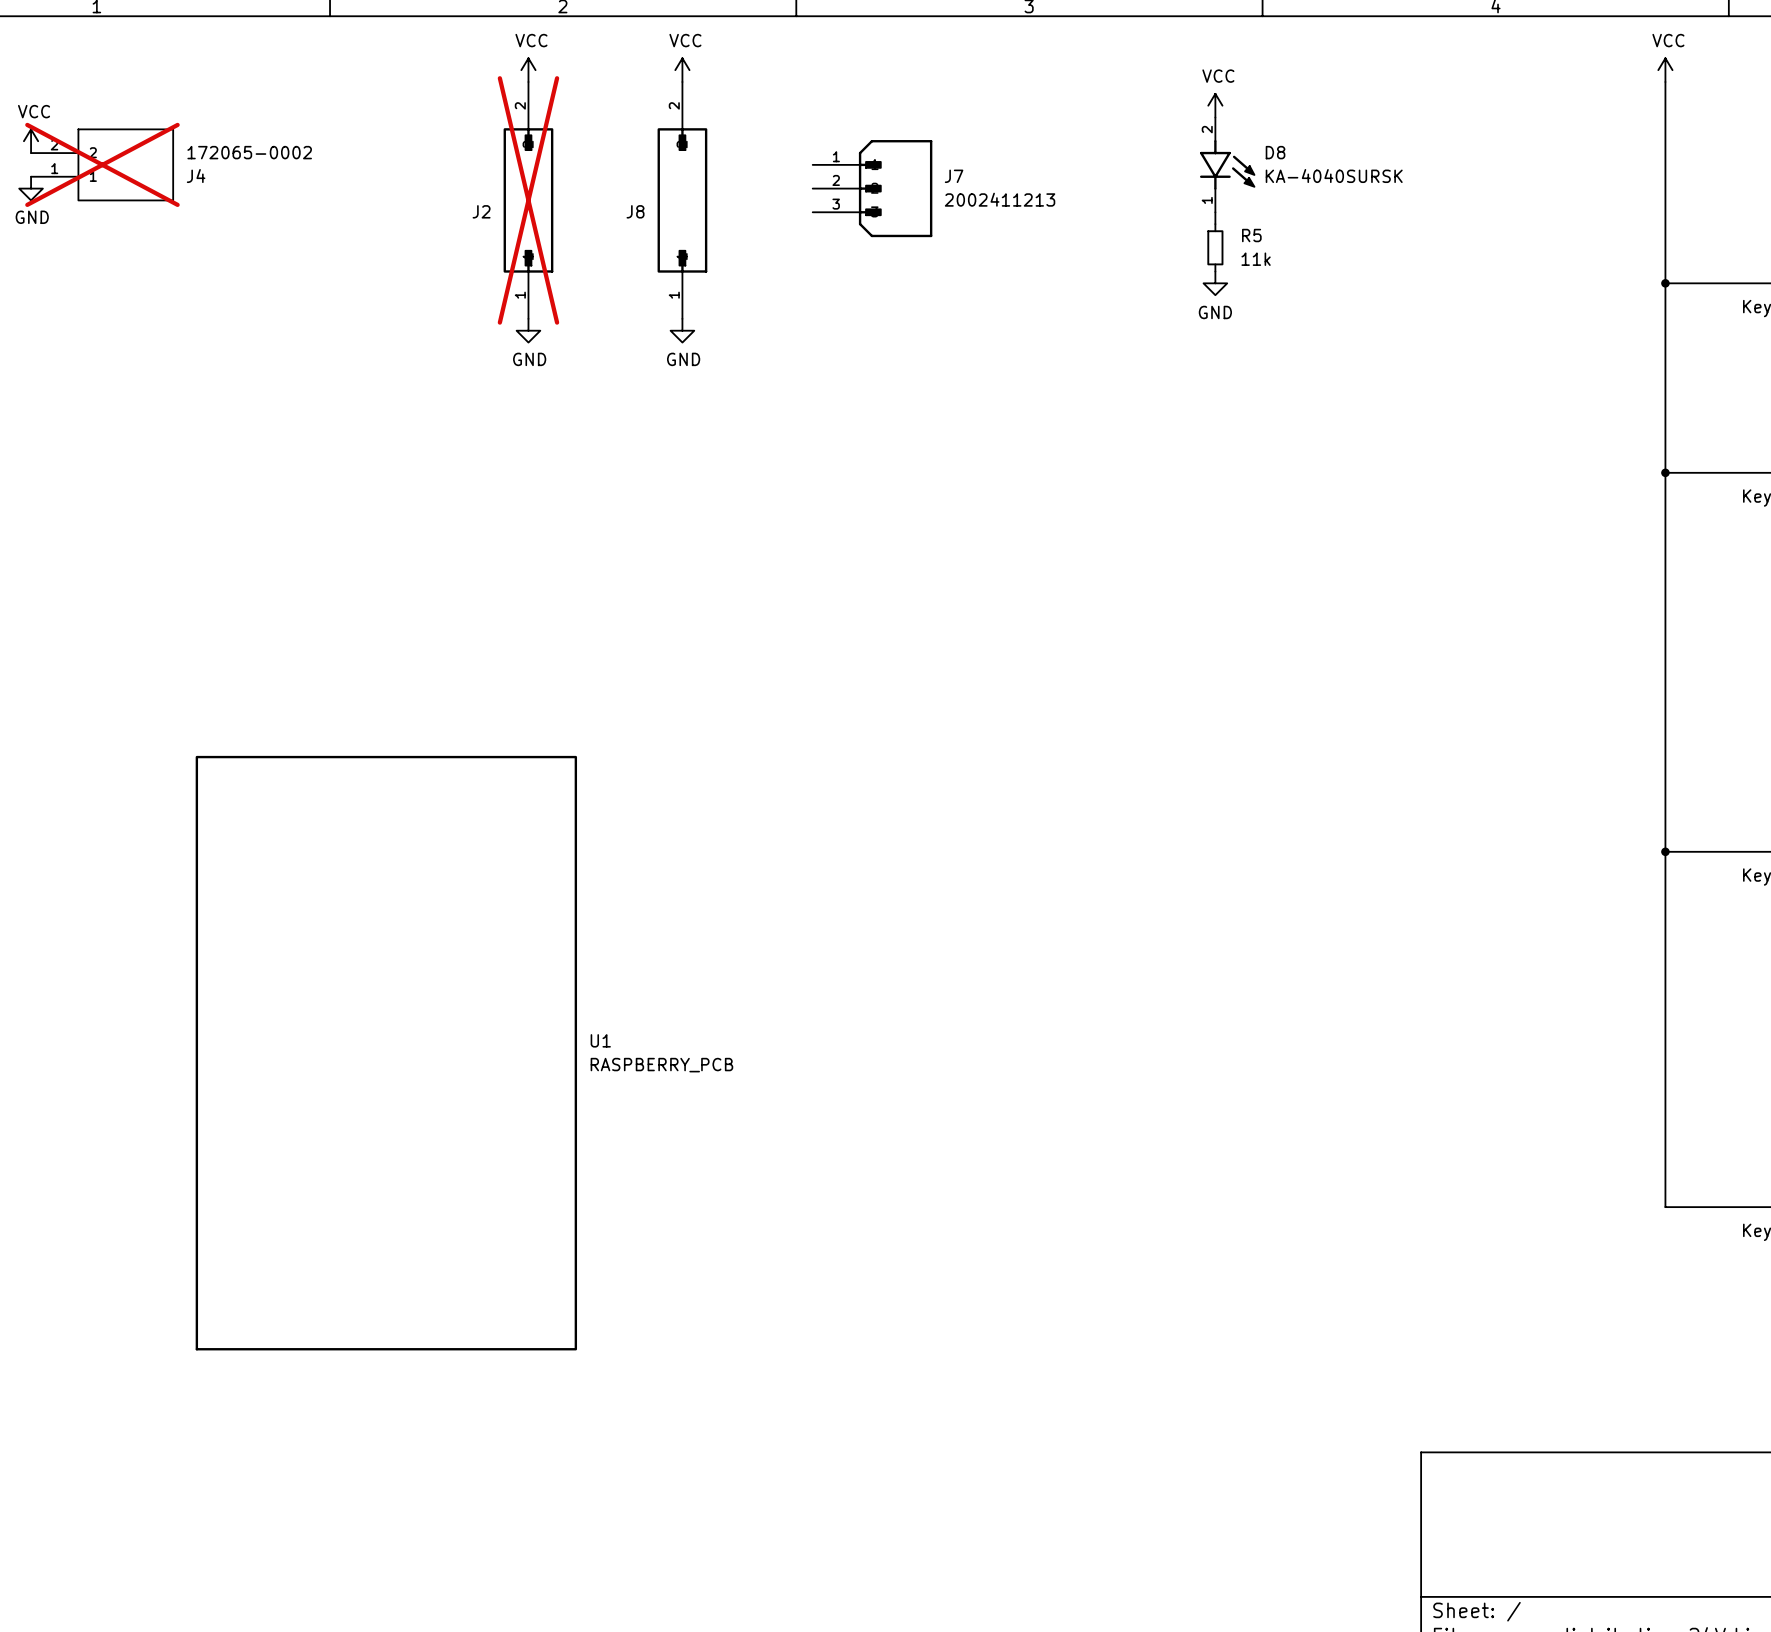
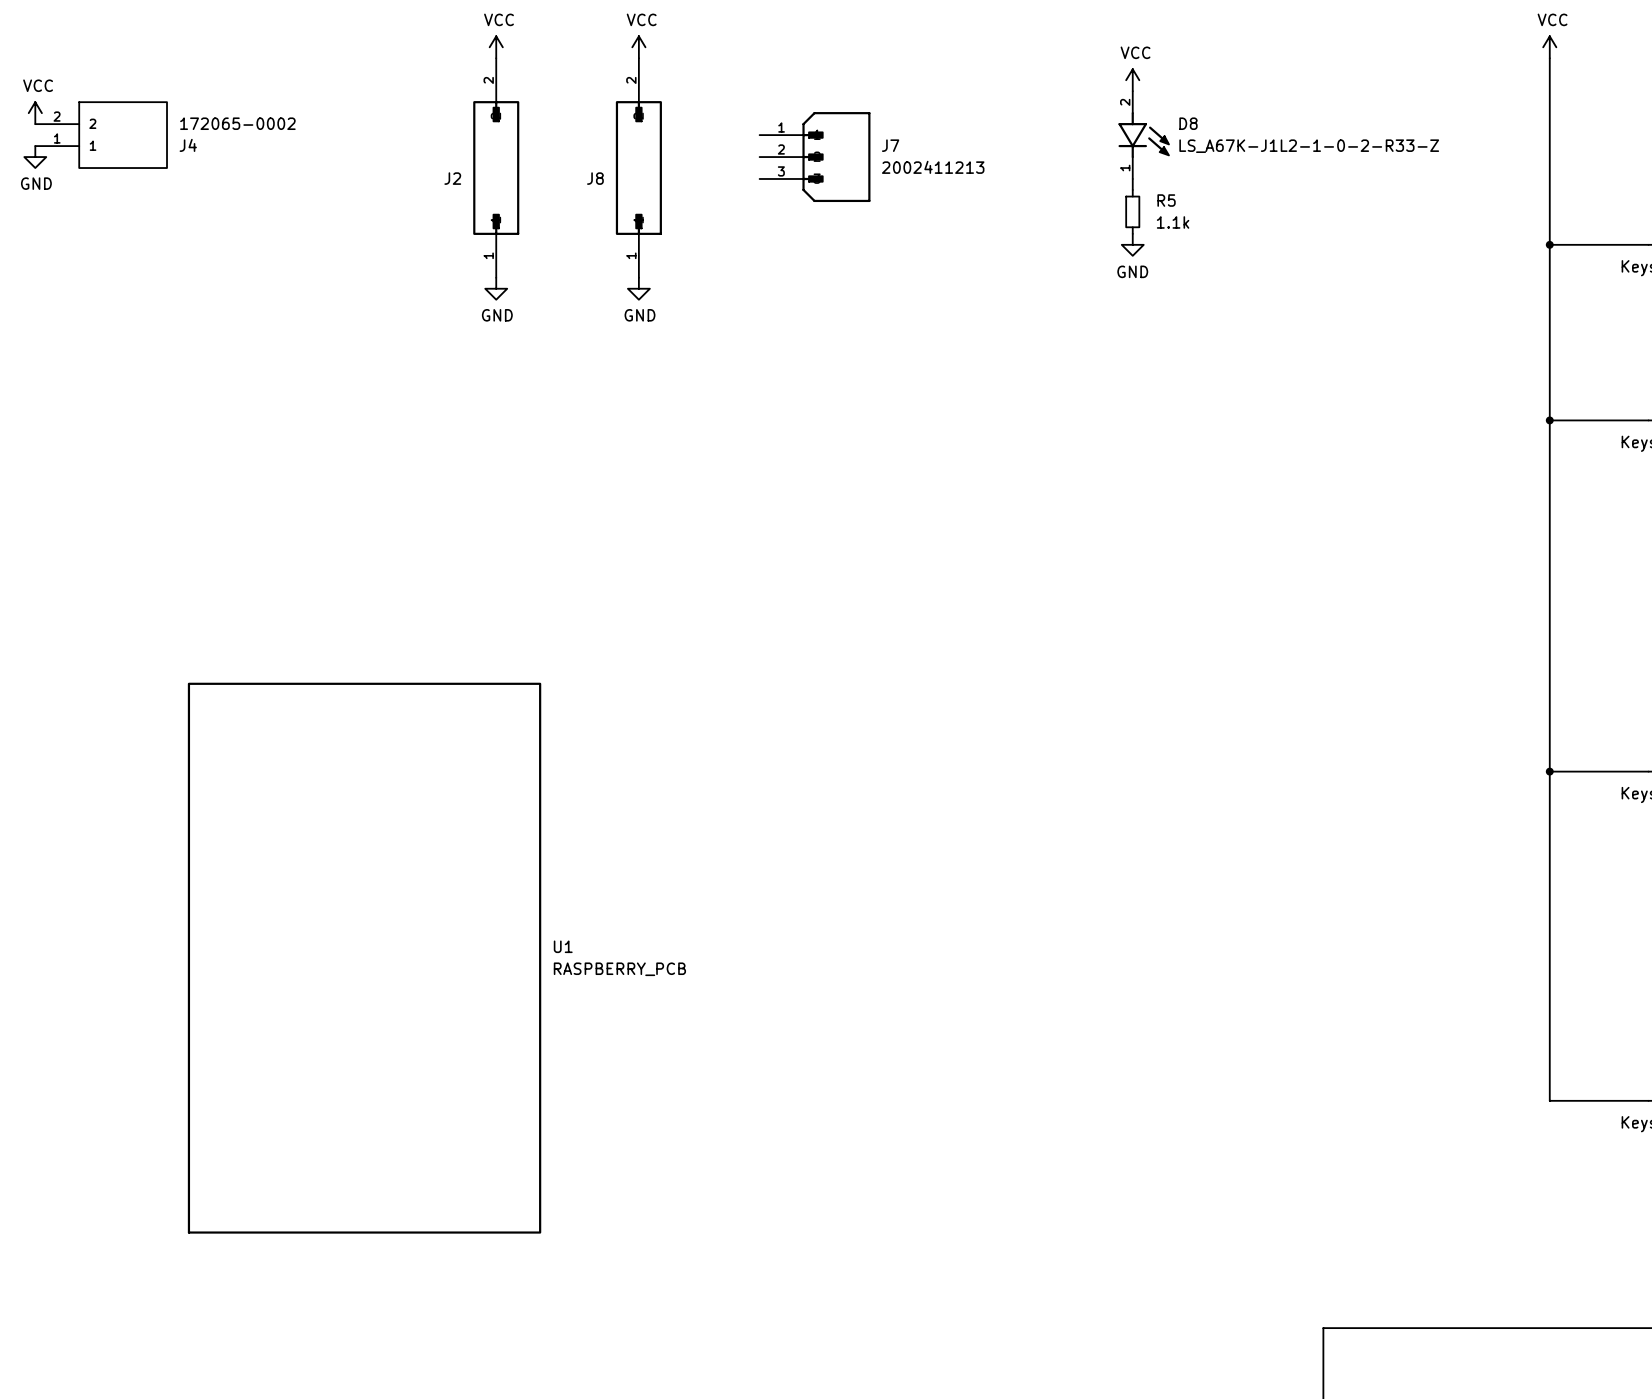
J4 do-not-place cross: (102, 164) -> none
D8 value: KA-4040SURSK (1334, 176) -> LS_A67K-J1L2-1-0-2-R33-Z (1309, 146)
J2 do-not-place cross: (528, 200) -> none
R5 value: 11k (1256, 259) -> 1.1k (1173, 222)

